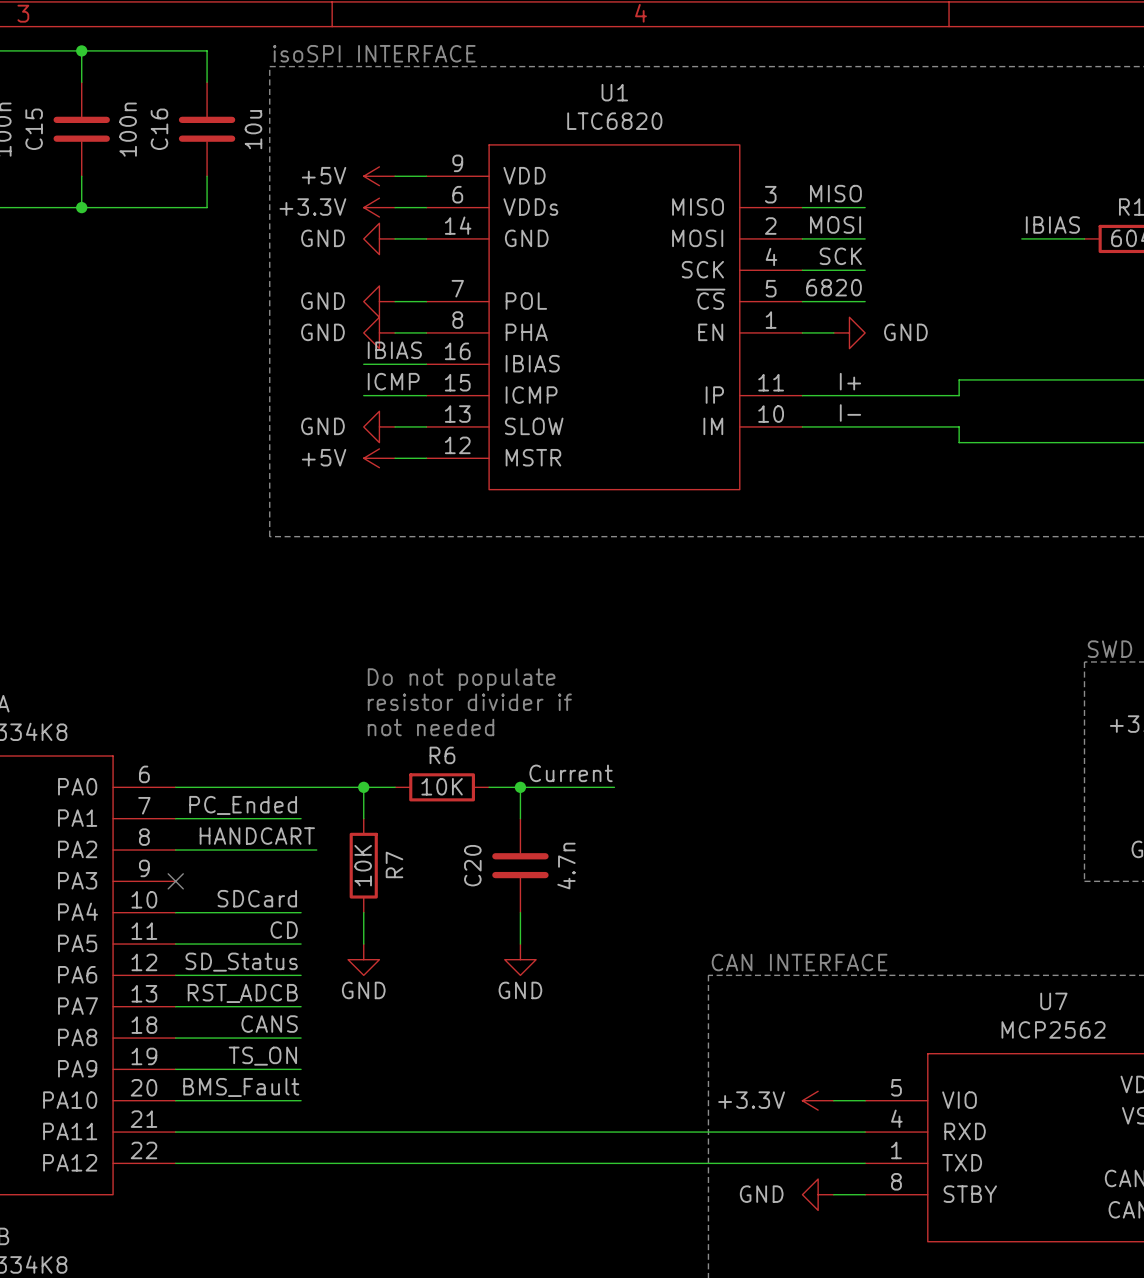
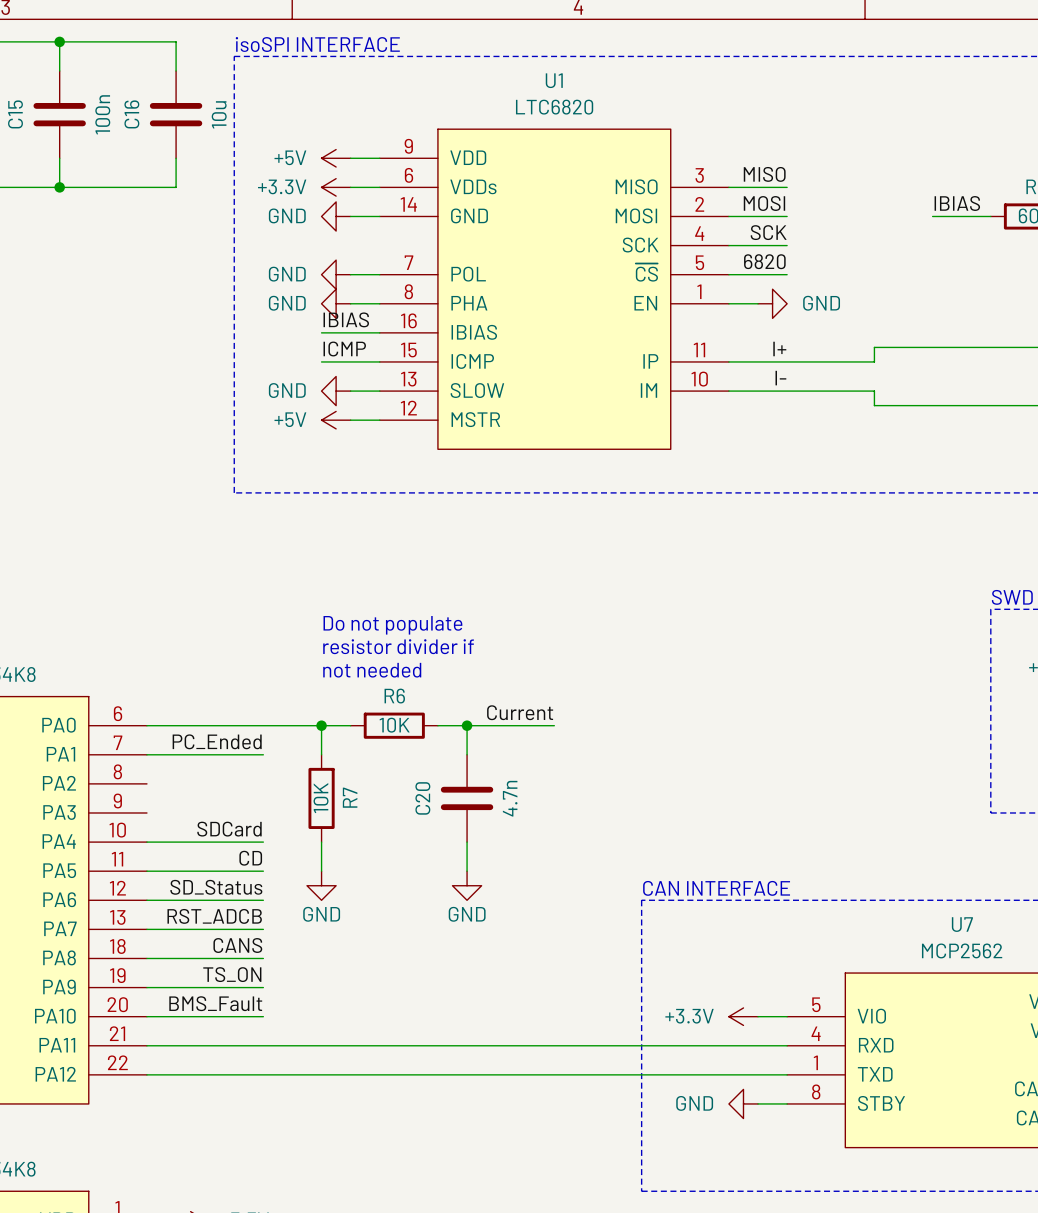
label: HANDCART (257, 836) -> none
wire: (175, 850) (316, 850) -> none
no-connect mark: (175, 881) -> none

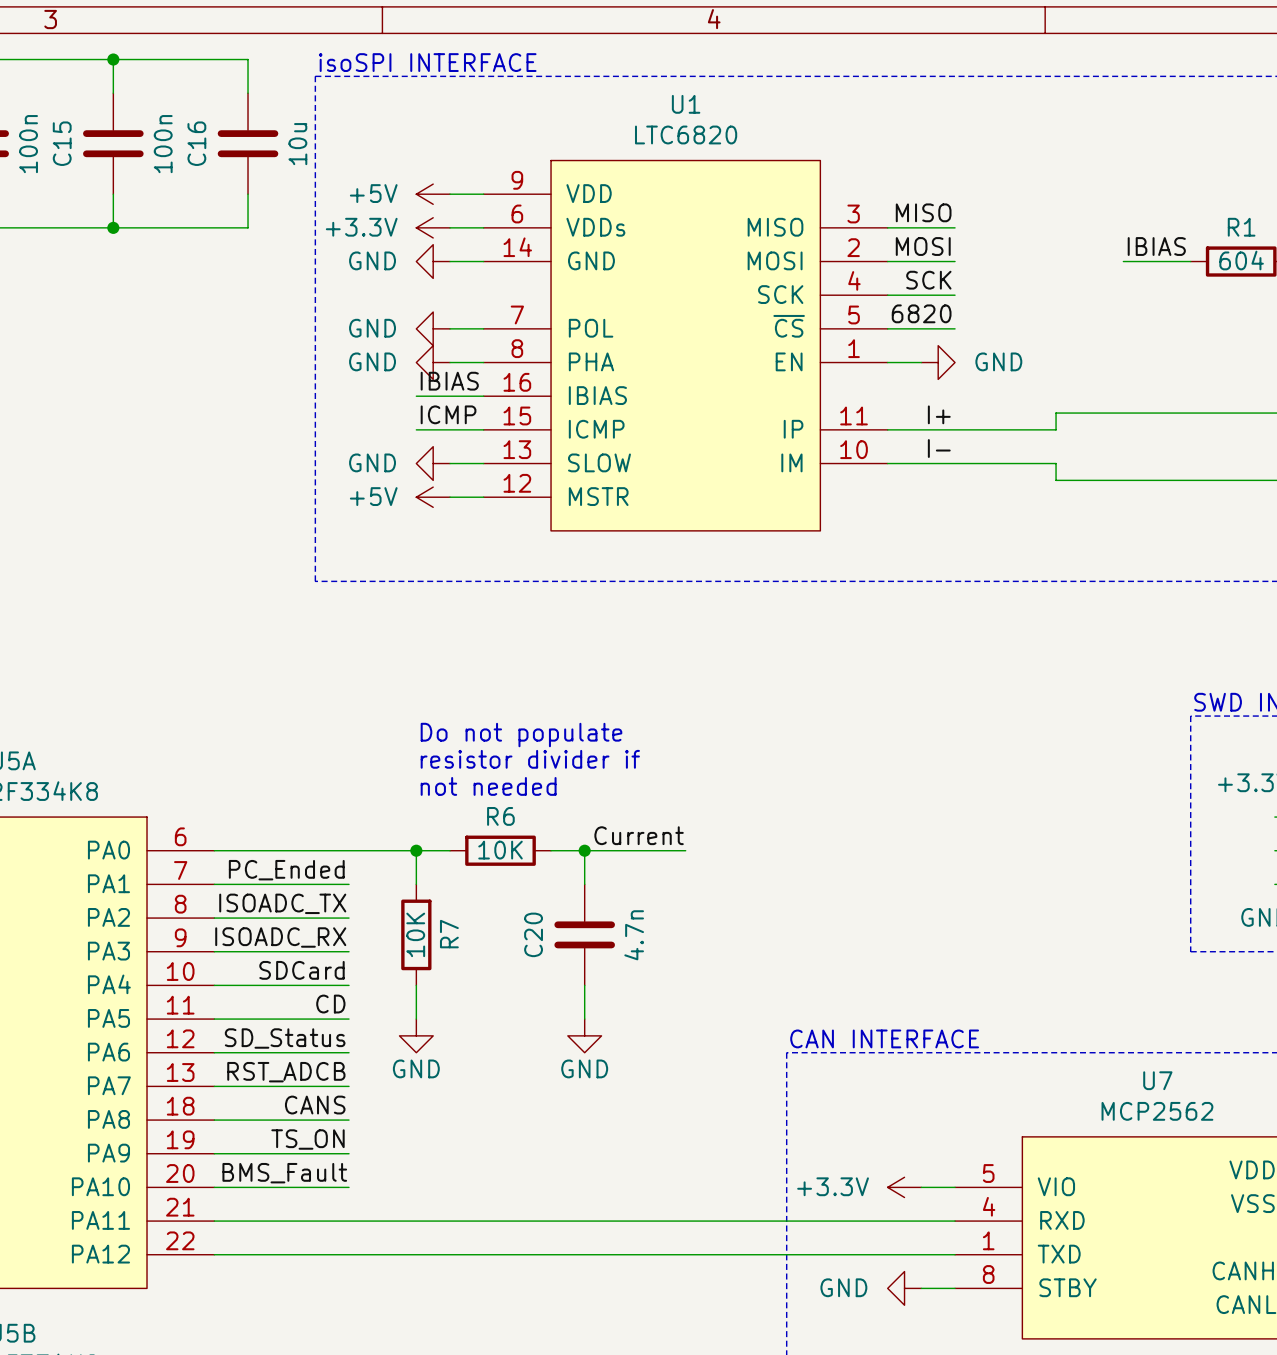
label: none -> ISOADC_TX (282, 903)
wire: none -> (214, 918) (349, 918)
label: none -> ISOADC_RX (280, 937)
wire: none -> (214, 951) (349, 951)

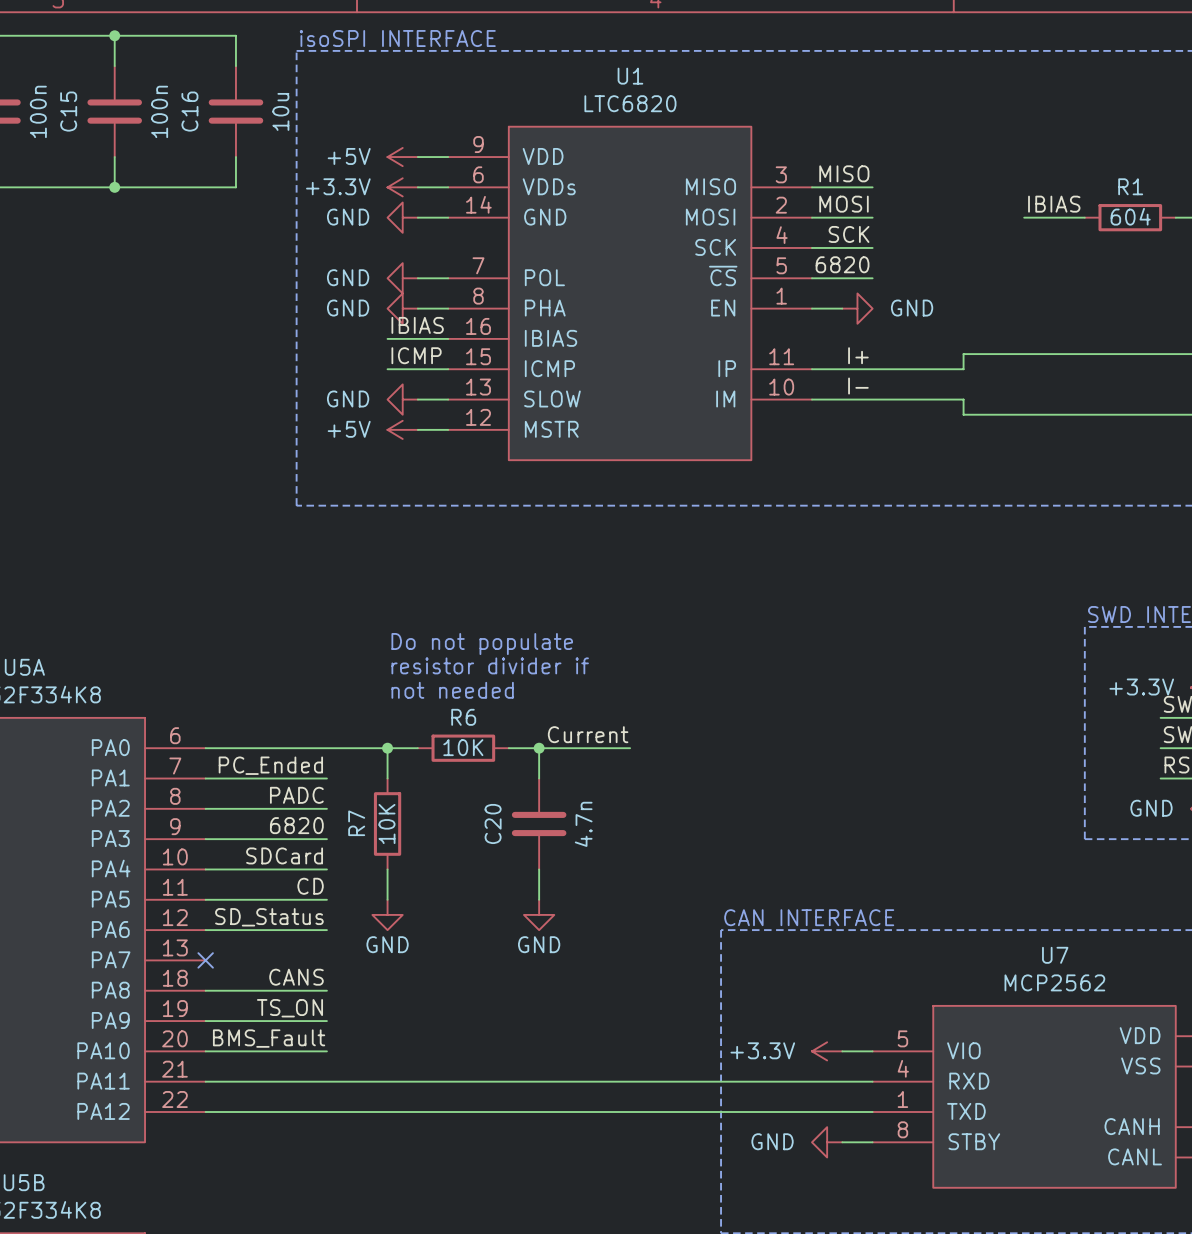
label: ISOADC_TX (282, 903) -> PADC (296, 795)
R7 name position: R7 (449, 934) -> R7 (356, 823)
label: ISOADC_RX (280, 937) -> 6820 (296, 825)
label: RST_ADCB (286, 1072) -> none
wire: (214, 1086) (349, 1086) -> none
no-connect mark: none -> (205, 960)

